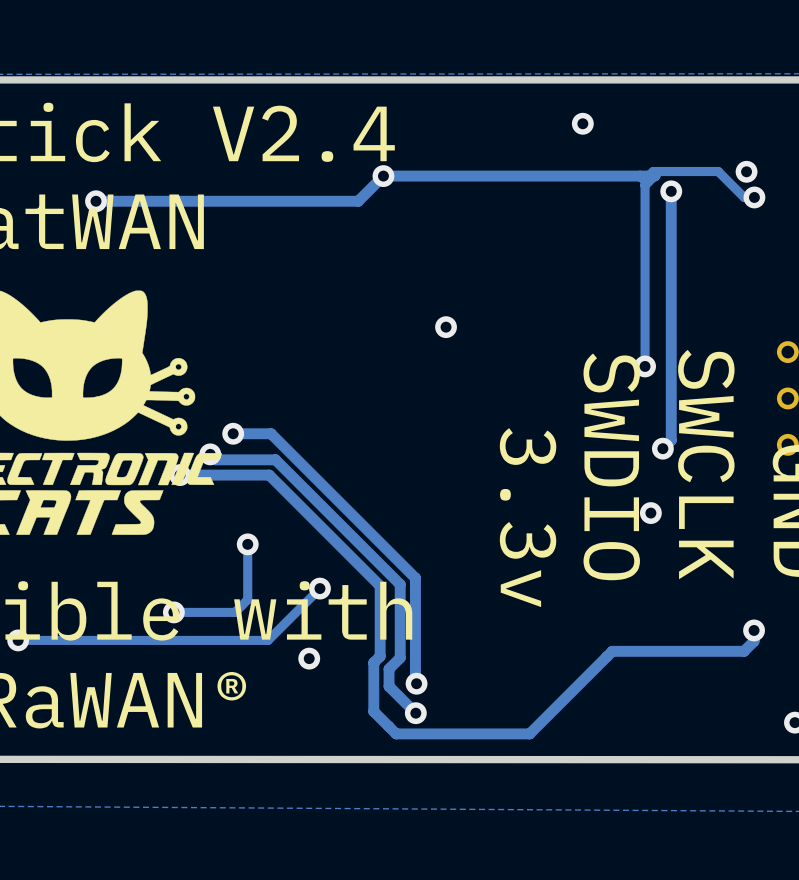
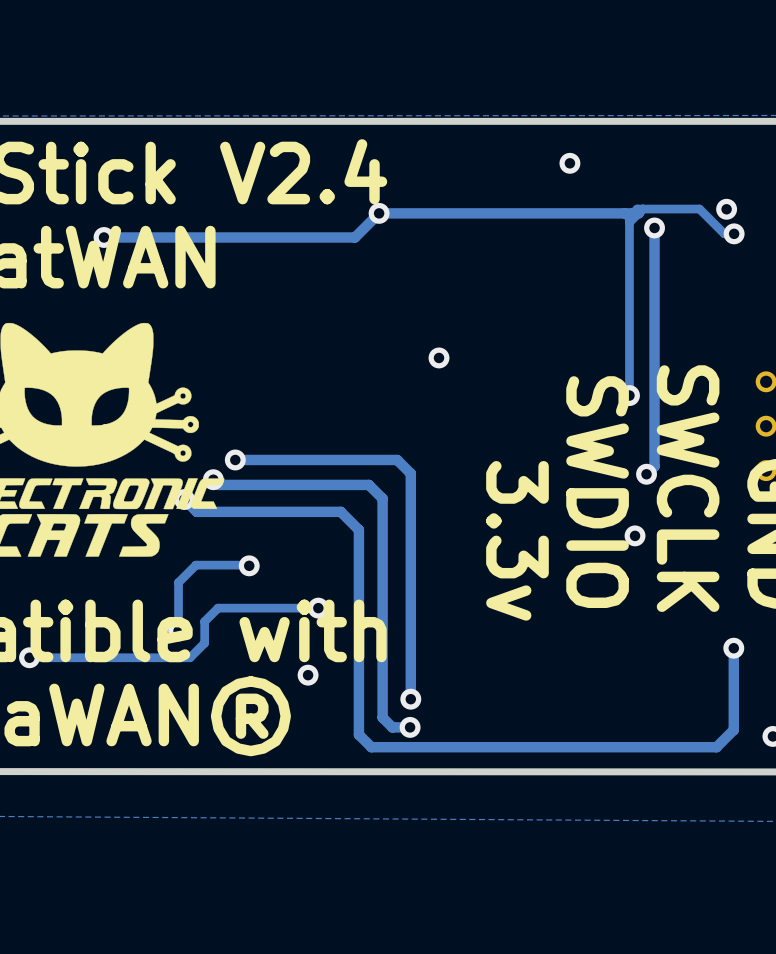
track: (271, 433) (415, 578) (416, 683) -> (271, 459) (397, 459) (410, 473) (410, 699)
track: (275, 459) (400, 584) (400, 657) (389, 669) (389, 686) (415, 713) -> (275, 484) (368, 484) (382, 498) (382, 717) (392, 727) (410, 727)
track: (180, 475) (269, 475) (380, 585) (380, 656) (373, 662) (373, 711) (396, 733) -> (184, 499) (196, 511) (340, 511) (358, 529) (358, 734) (371, 747) (391, 747)
track: (247, 544) (247, 599) (235, 612) (173, 612) -> (249, 565) (195, 565) (178, 582) (178, 630)
track: (319, 588) (268, 640) (185, 640) -> (318, 608) (218, 608) (204, 621) (204, 643) (190, 657)
track: (754, 641) (744, 651) (612, 651) (529, 733) -> (733, 658) (733, 729) (716, 747) (519, 747)

